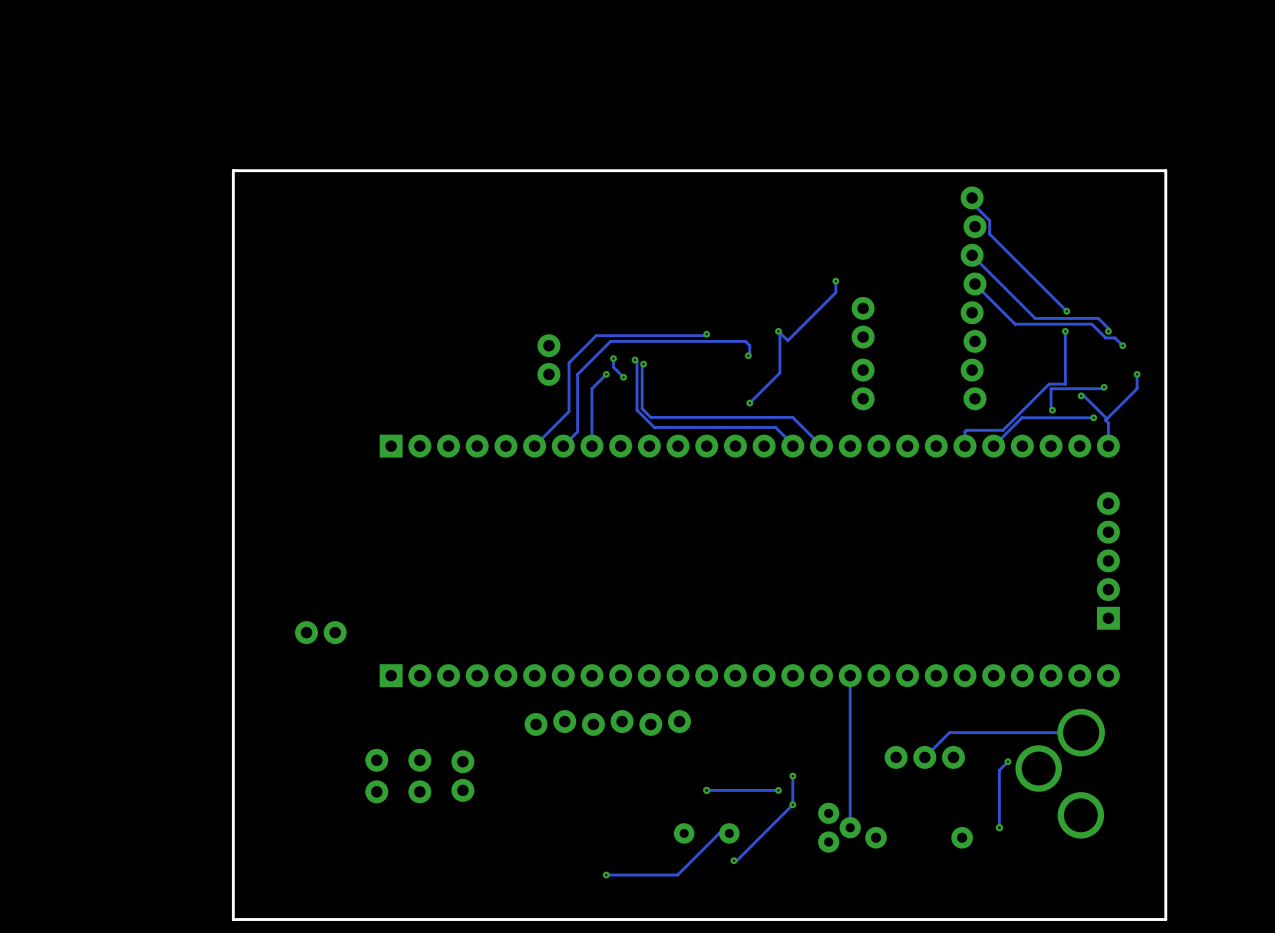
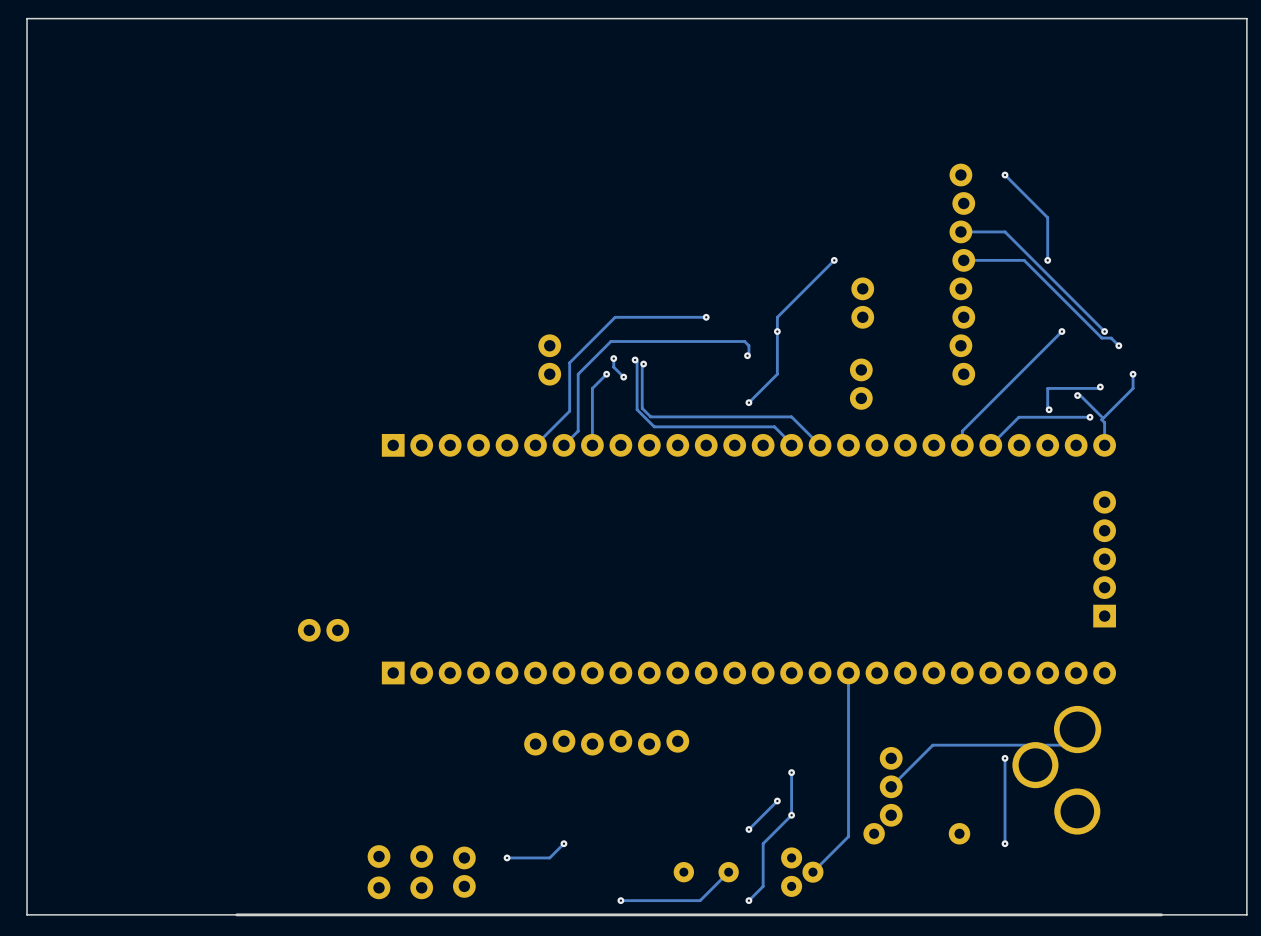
track: none -> (1005, 175) (1047, 217) (1047, 260)
via: none -> (1005, 175)
track: (972, 197) (972, 203) (989, 220) (989, 234) (1066, 311) -> none
track: (972, 255) (1035, 318) (1098, 318) (1108, 328) (1108, 331) -> (960, 231) (1005, 231) (1104, 331)
track: (835, 281) (835, 292) (787, 340) (778, 331) -> none
via position: (835, 281) -> (834, 260)
track: (975, 284) (1015, 324) (1091, 324) -> (963, 260) (1024, 260) (1088, 324)
part position: (973, 298) -> (962, 274)
via position: (1066, 311) -> (1047, 260)
part position: (863, 322) -> (862, 303)
track: (1065, 331) (1065, 384) (1049, 384) (1002, 430) (966, 430) -> (1061, 331) (963, 429)
track: (779, 332) (778, 374) -> (834, 260) (777, 317) (777, 374)
track: (706, 334) (596, 335) -> (706, 317) (615, 317) (596, 335)
via position: (706, 334) -> (706, 317)
part position: (607, 722) -> (606, 742)
track: (1081, 732) (949, 732) (924, 757) -> none
track: none -> (1076, 745) (932, 745) (891, 786)
part rotation: 0° (924, 757) -> 90° clockwise (891, 786)
track: (1007, 761) (999, 770) (999, 827) -> (1005, 758) (1005, 843)
part: (376, 776) -> none
part: (419, 776) -> none
part position: (462, 776) -> (464, 872)
via: (706, 790) -> none
track: (778, 790) (706, 790) -> none
via: (778, 790) -> none
track: none -> (777, 801) (748, 829)
via: none -> (777, 801)
track: (792, 804) (736, 860) (734, 860) -> (791, 801) (791, 815) (763, 843) (763, 886) (748, 900)
via: (792, 804) -> none
via: none -> (791, 815)
part position: (839, 827) -> (802, 872)
track: none -> (848, 823) (848, 836) (812, 872)
via: (999, 827) -> none
part position: (706, 833) -> (706, 872)
track: (729, 833) (719, 833) (677, 875) (606, 875) -> none
via: none -> (748, 829)
track: none -> (563, 843) (549, 857) (507, 857)
via: none -> (563, 843)
via: none -> (1005, 843)
via: (734, 860) -> none
via: none -> (507, 857)
via: (606, 875) -> none
part: none -> (379, 872)
part: none -> (421, 872)
track: none -> (728, 872) (700, 900) (620, 900)
via: none -> (620, 900)
via: none -> (748, 900)
board edge: (1165, 919) (1165, 170) (233, 170) (233, 919) -> (1161, 914) (1246, 914) (1246, 18) (27, 18) (27, 914) (236, 914)

